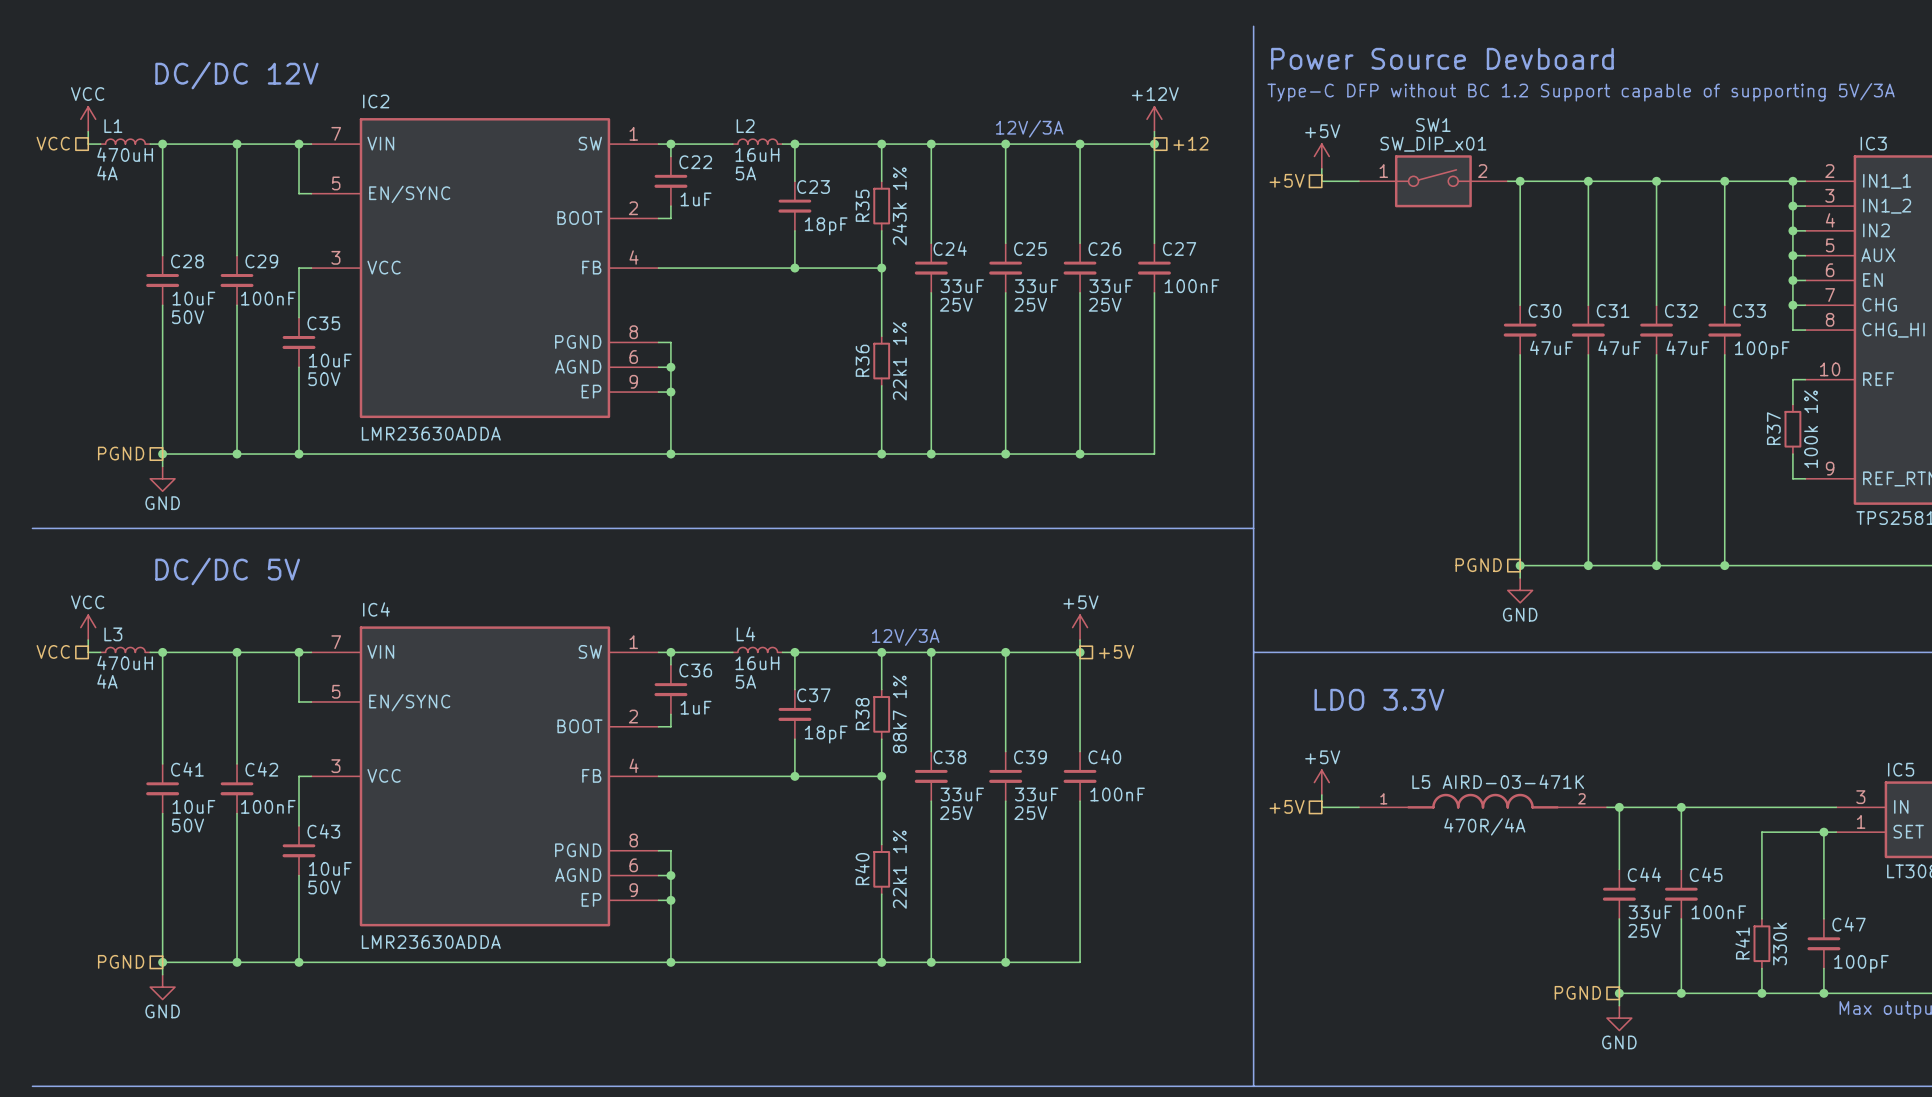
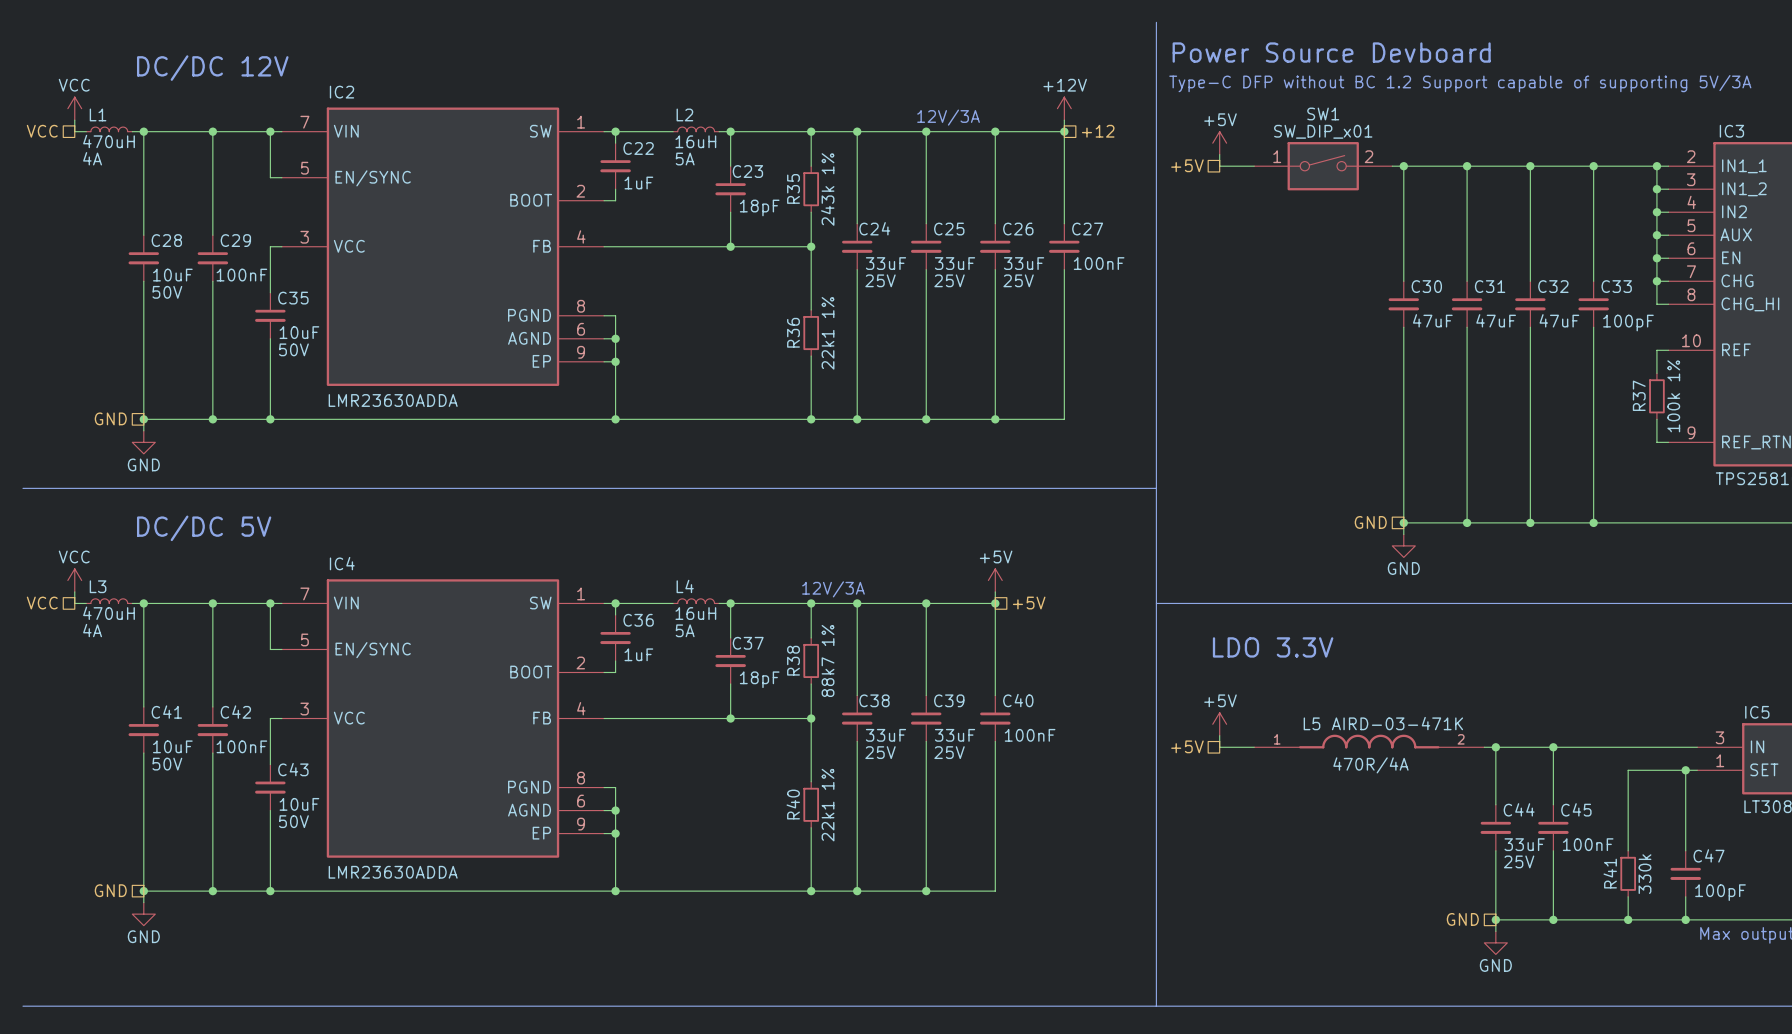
hierarchical label: PGND (121, 453) -> GND (110, 418)
hierarchical label: PGND (1478, 565) -> GND (1370, 522)
hierarchical label: PGND (121, 961) -> GND (110, 890)
hierarchical label: PGND (1577, 992) -> GND (1462, 919)

